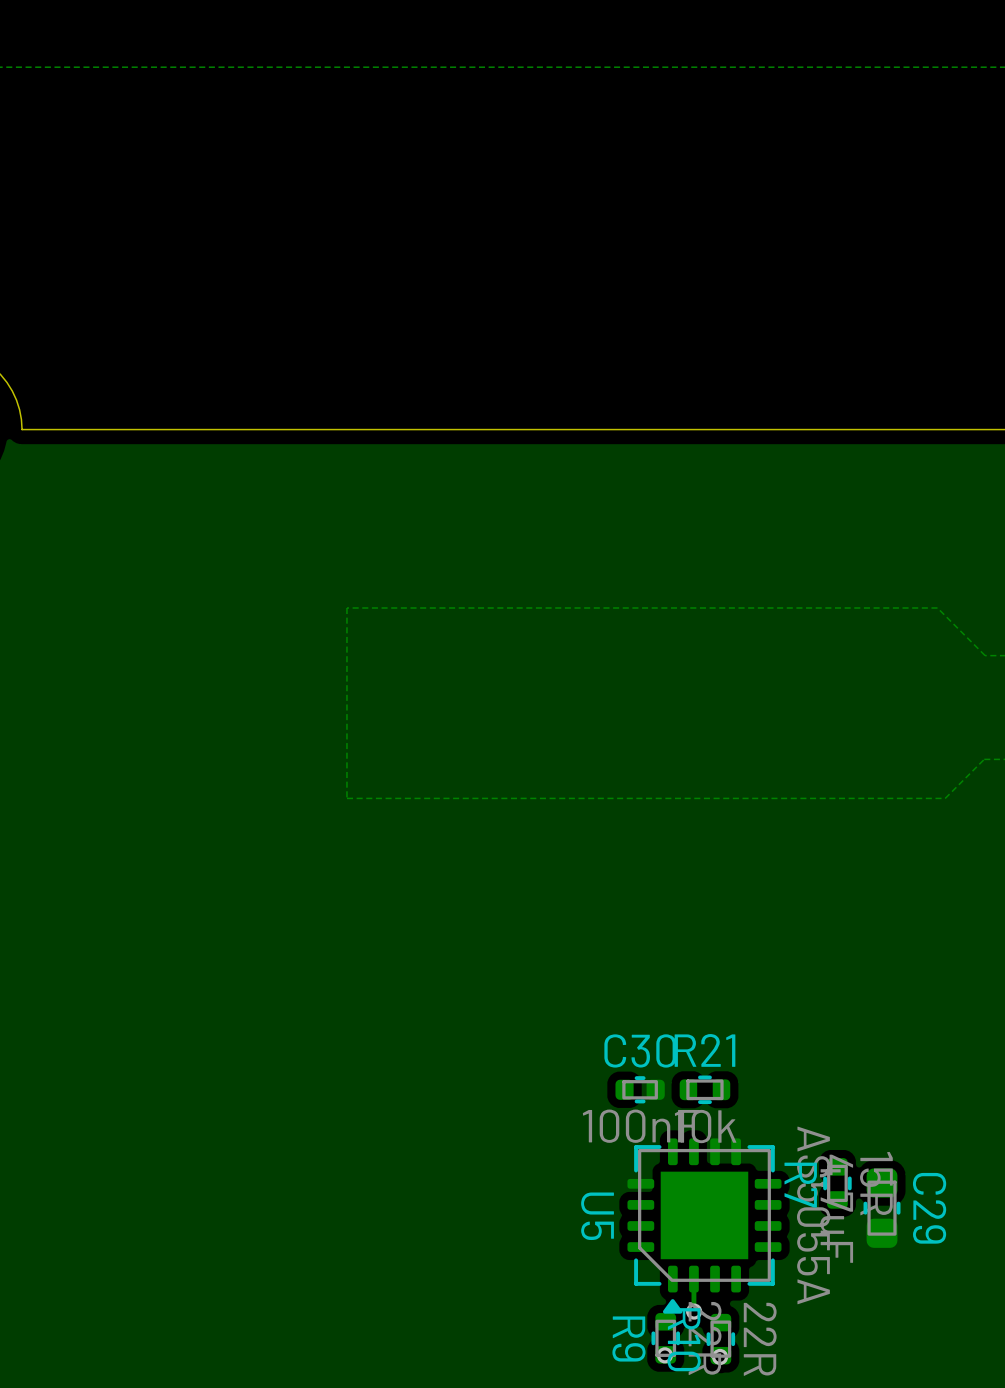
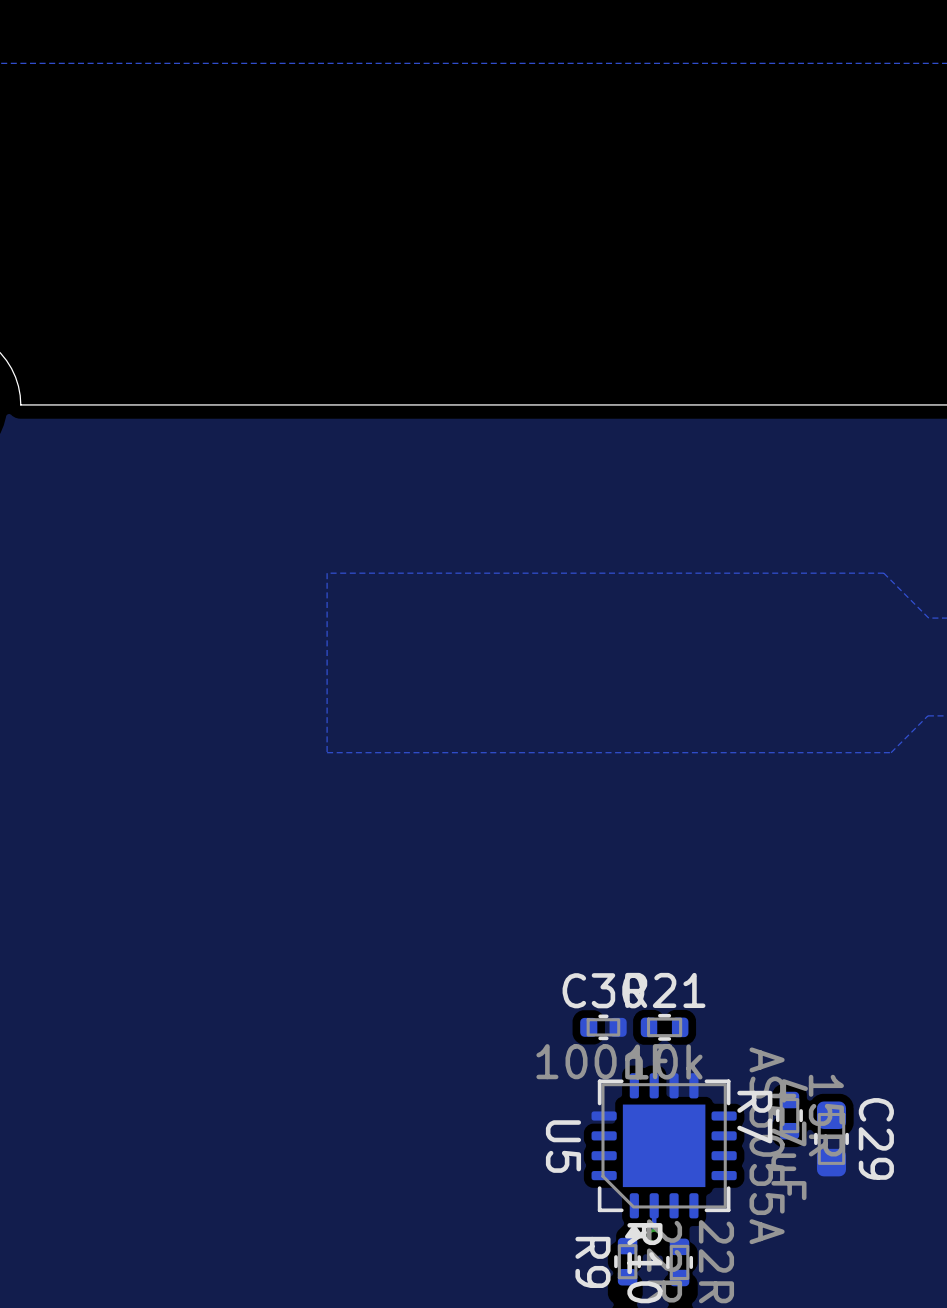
via: (664, 1355) -> none
via: (720, 1356) -> none

